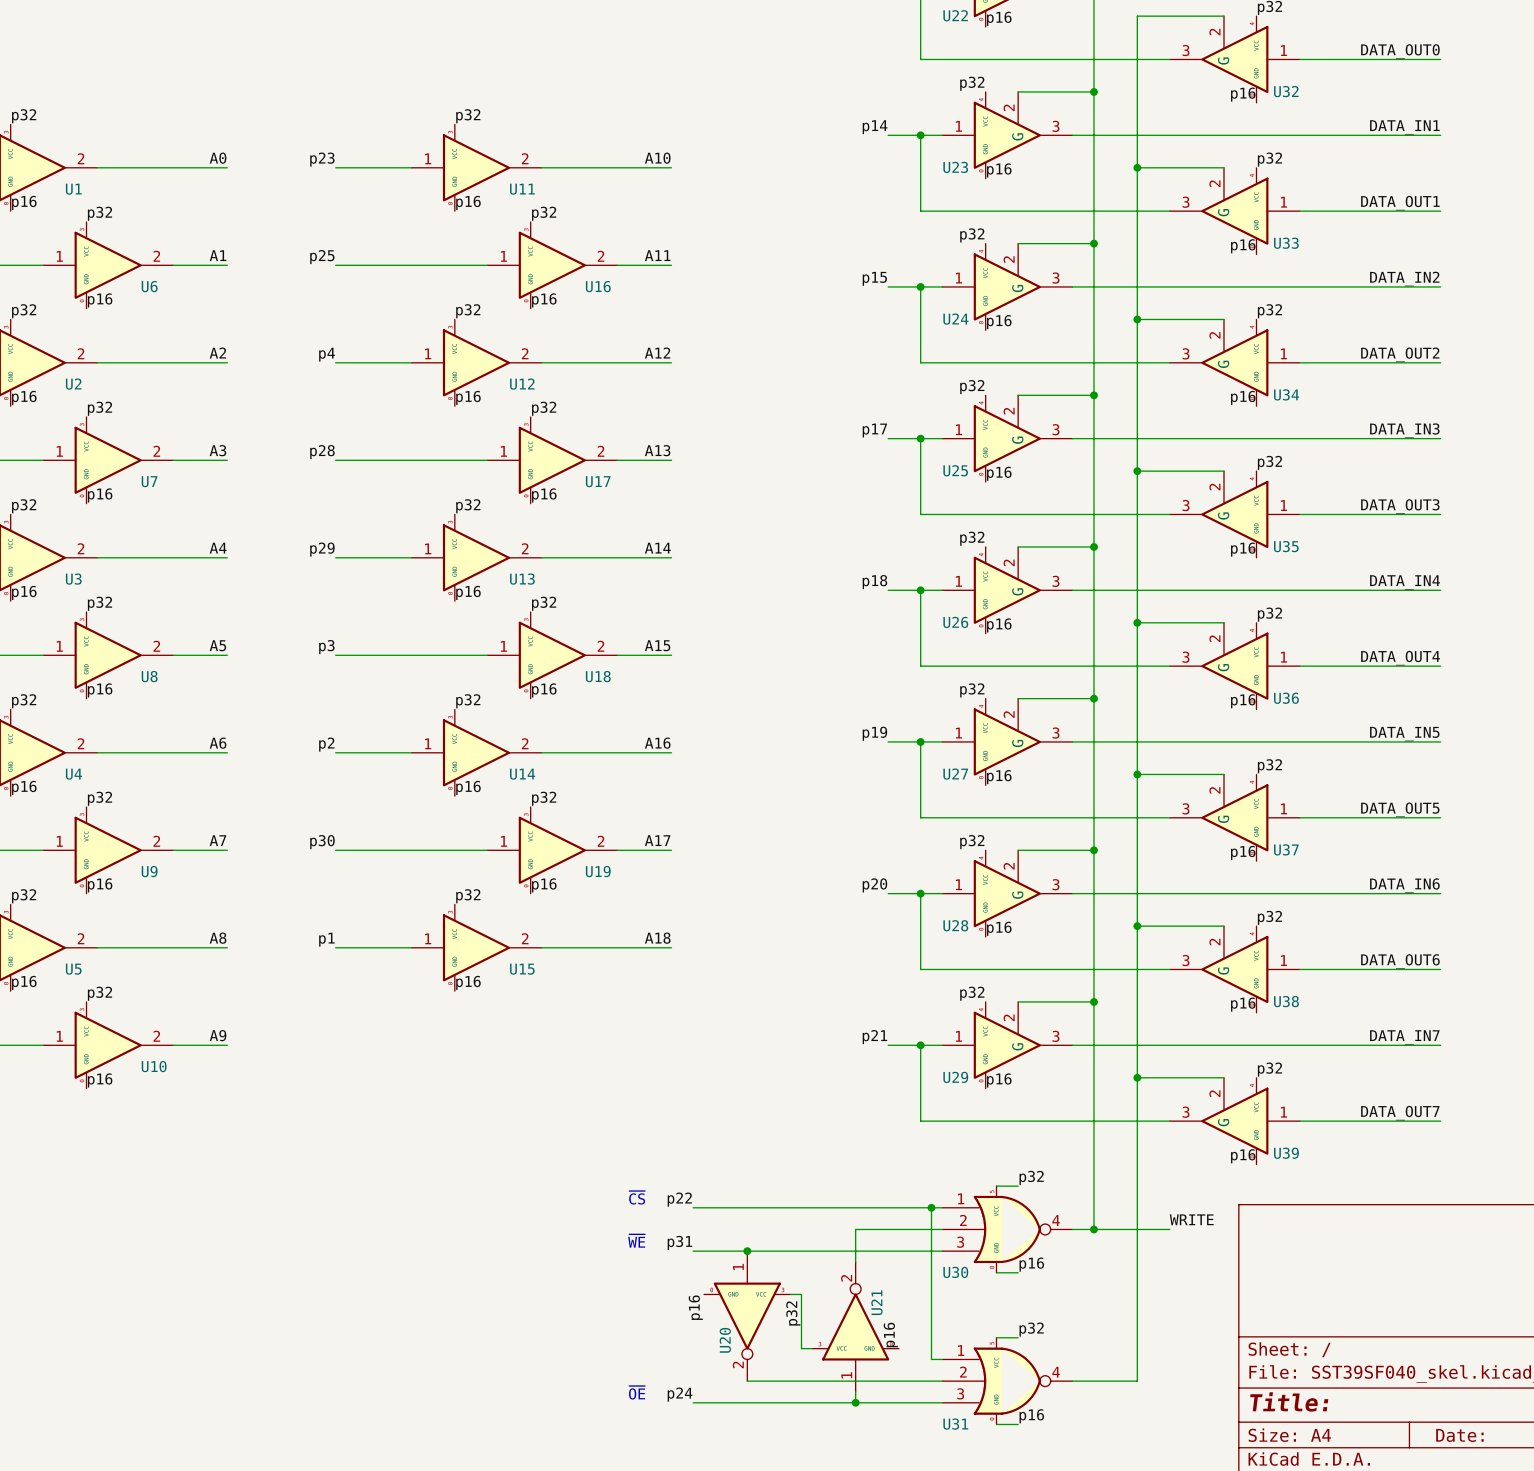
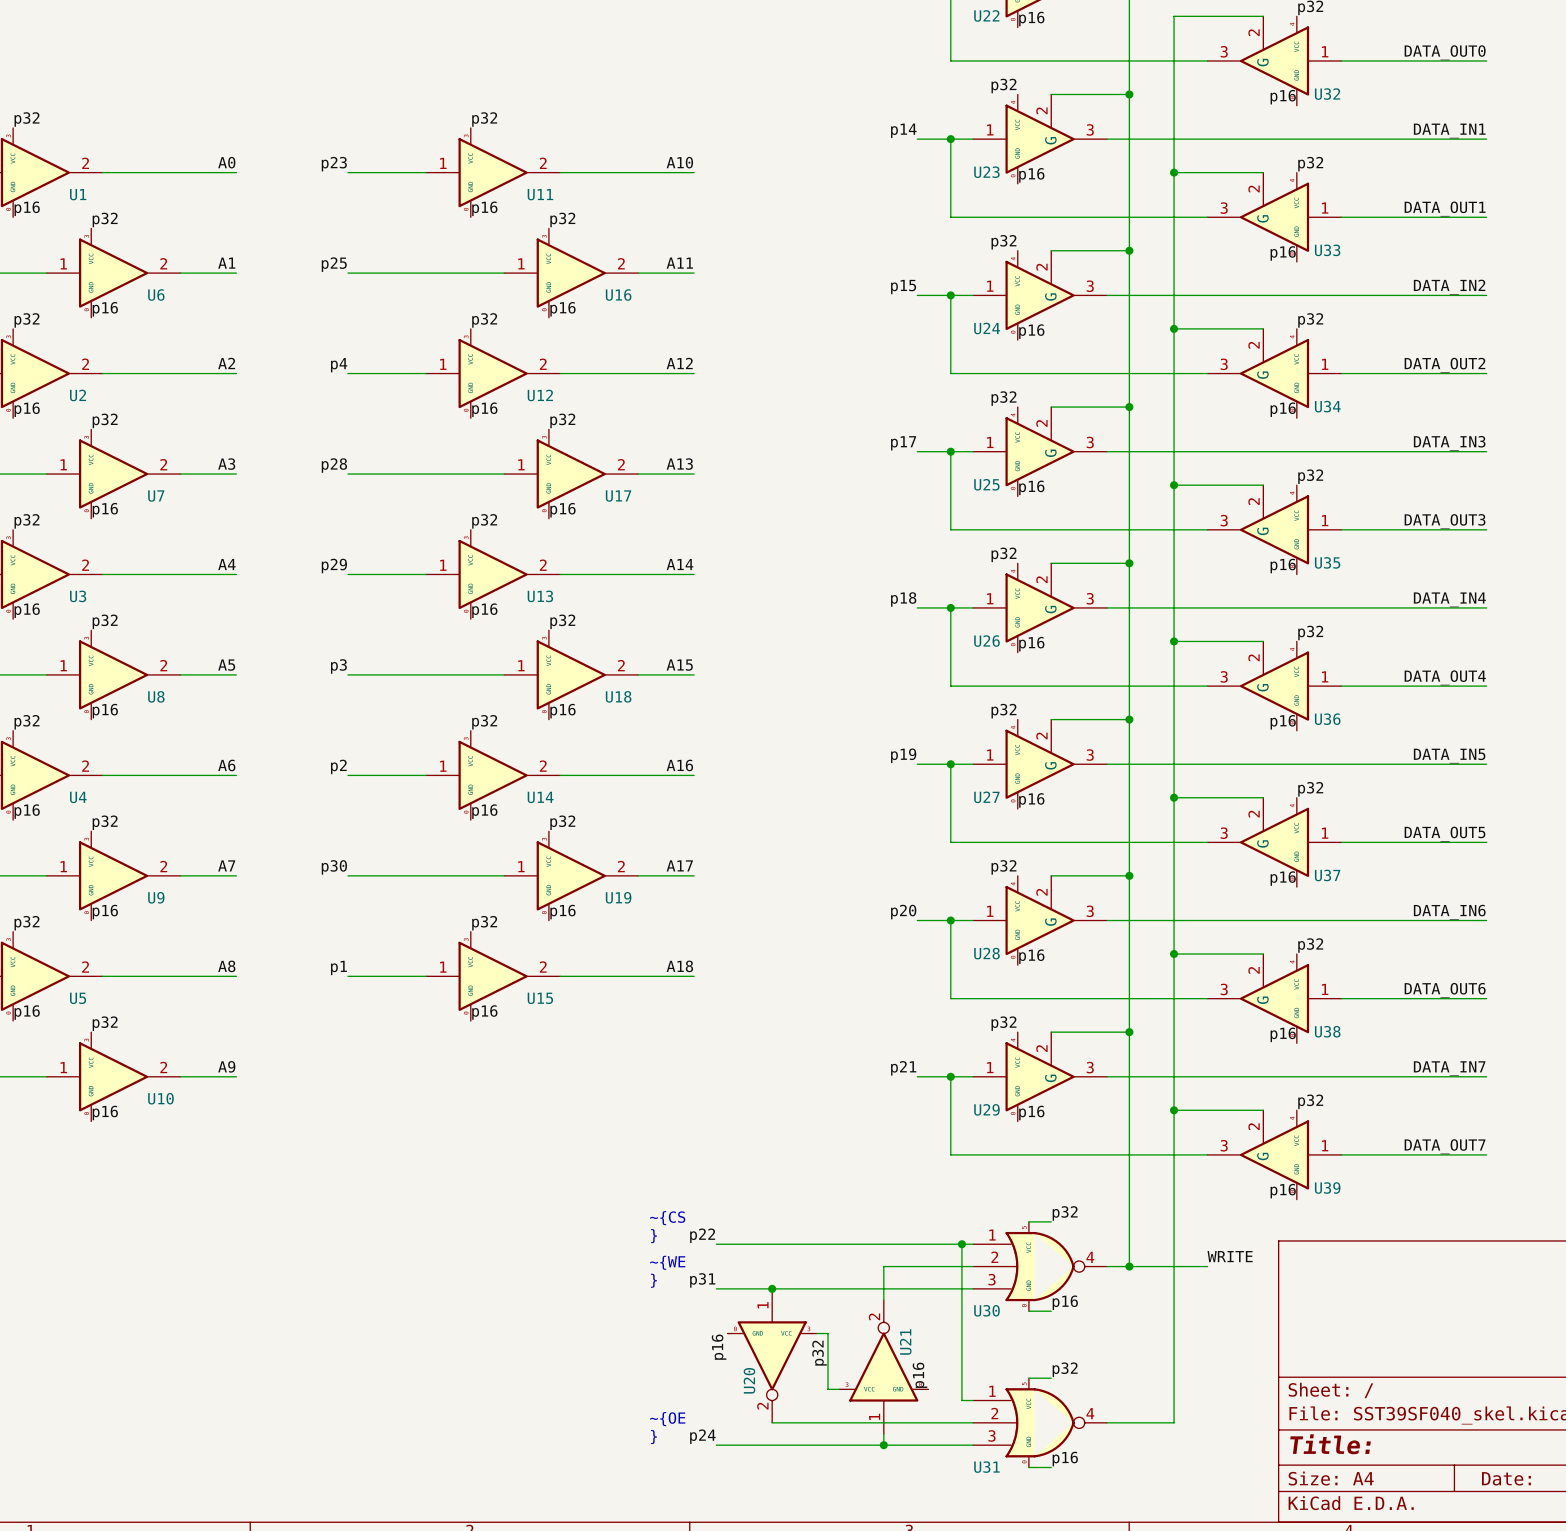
text: none -> ~{CS (667, 1218)
text: ~{CS} (637, 1197) -> } (654, 1236)
text: none -> ~{WE (667, 1262)
text: ~{WE} (636, 1241) -> } (654, 1280)
text: none -> ~{OE (667, 1419)
text: ~{OE} (637, 1392) -> } (654, 1437)

